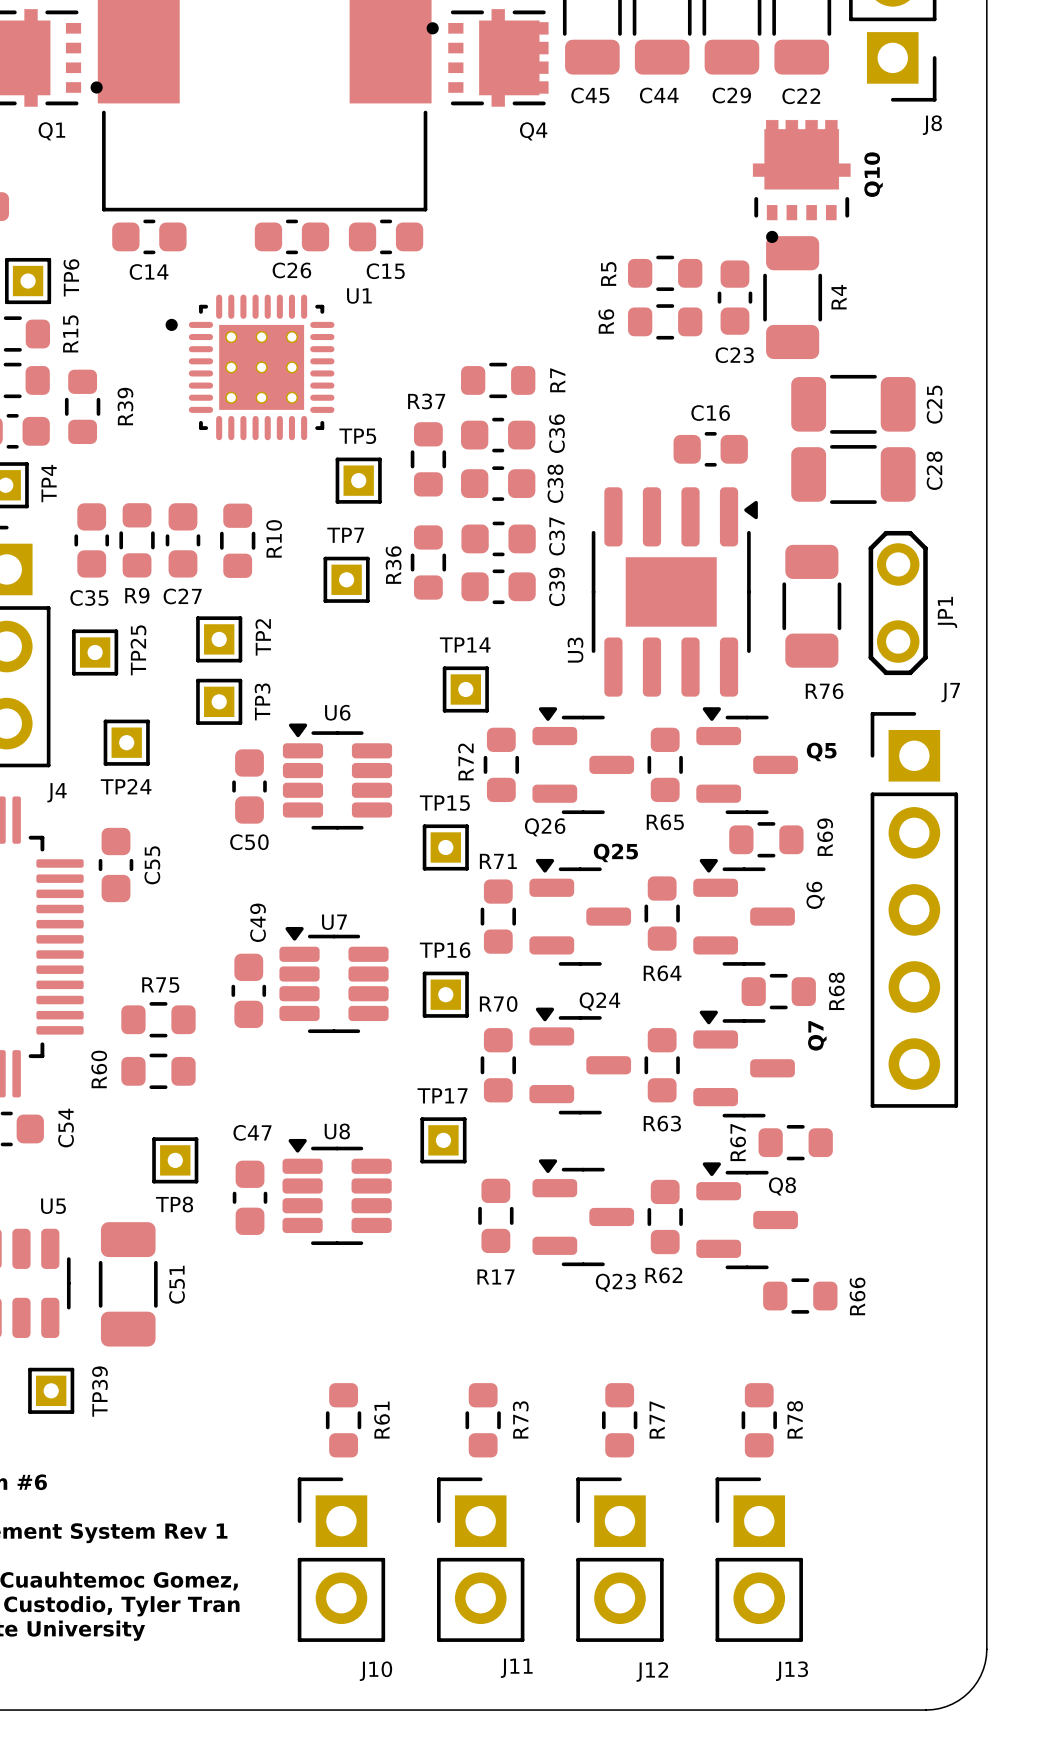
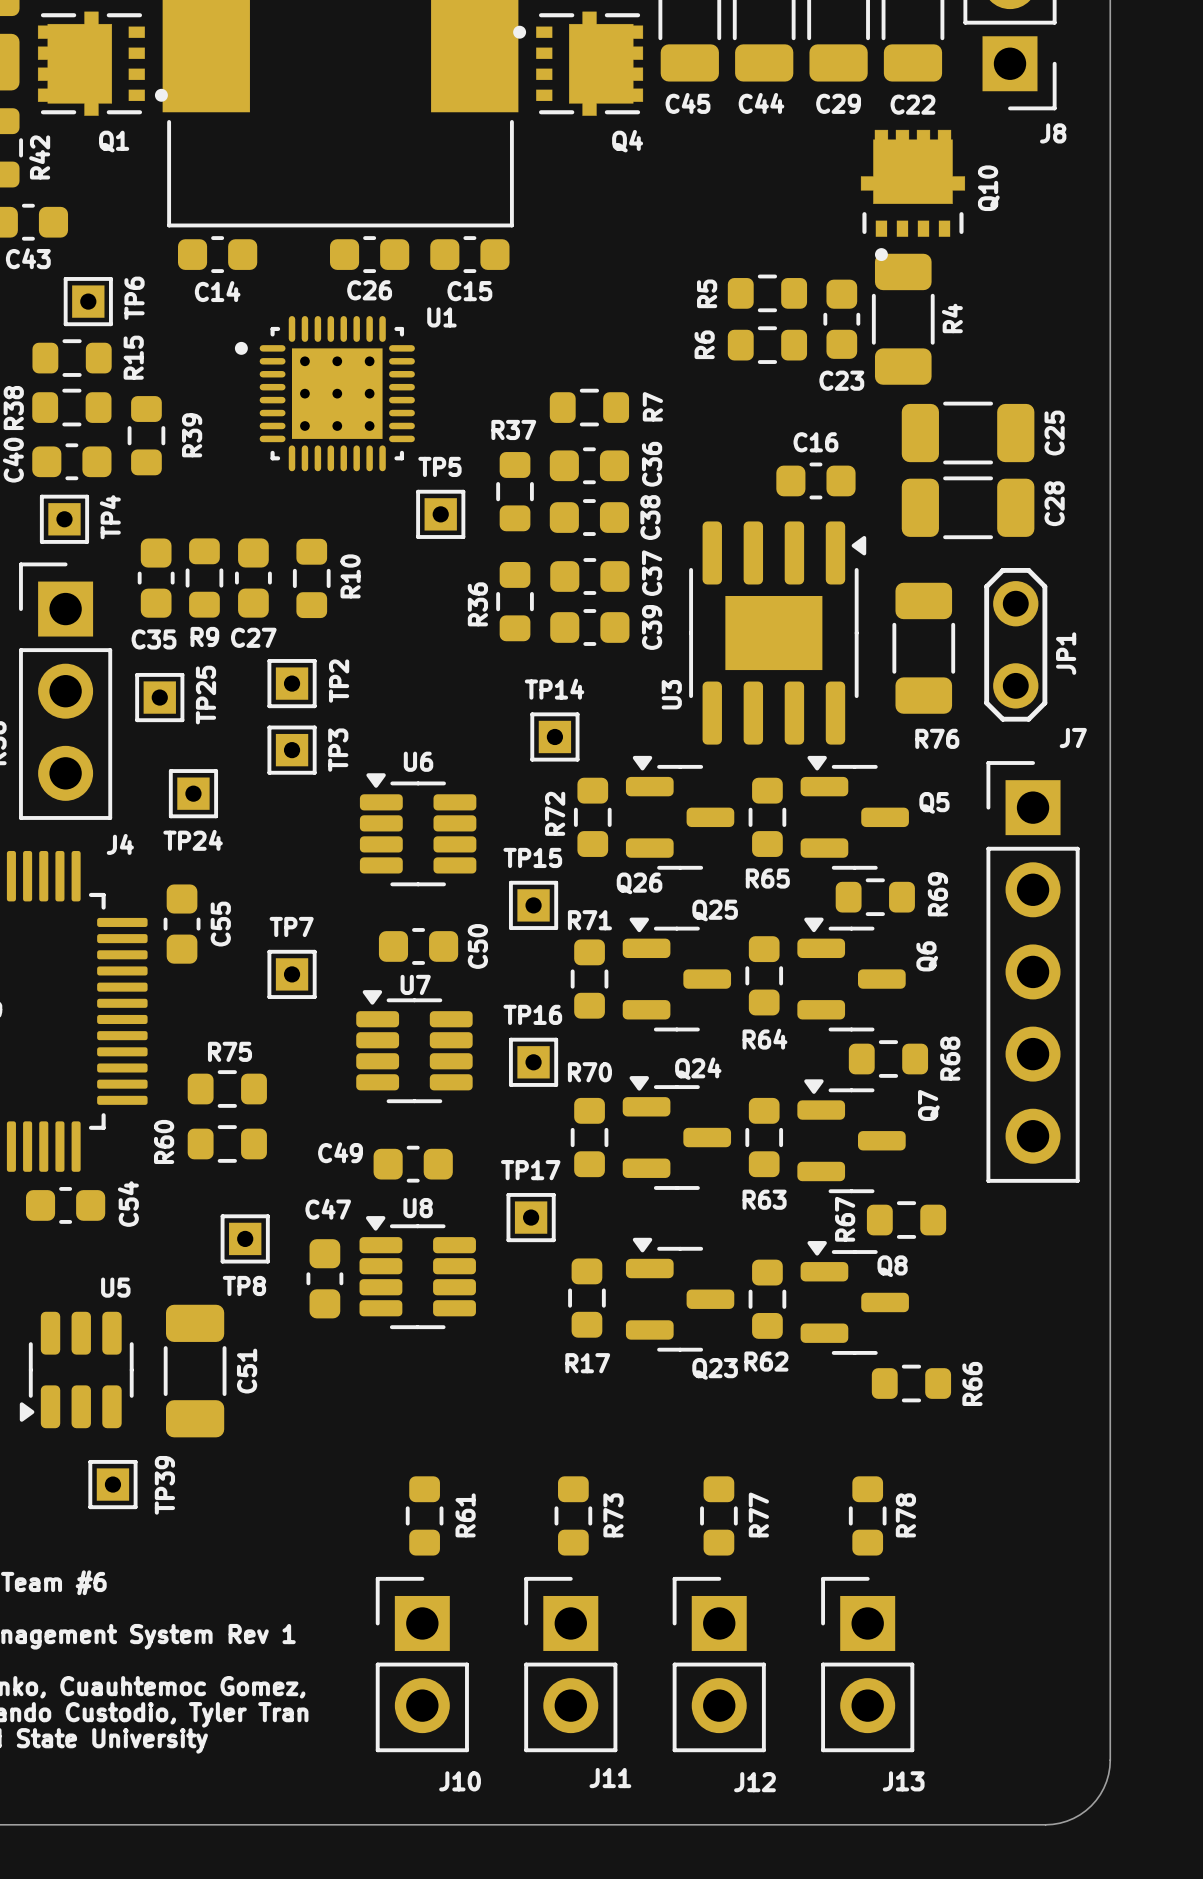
TP7 position: (346, 579) -> (292, 974)
C50 rotation: 0° (249, 786) -> 90° clockwise (418, 946)
C50 position: (249, 786) -> (418, 946)
C50 name position: C50 (249, 842) -> C50 (477, 946)
C49 name position: C49 (258, 922) -> C49 (340, 1152)
C49 rotation: 0° (248, 990) -> 90° clockwise (413, 1164)
C49 position: (248, 990) -> (413, 1164)

